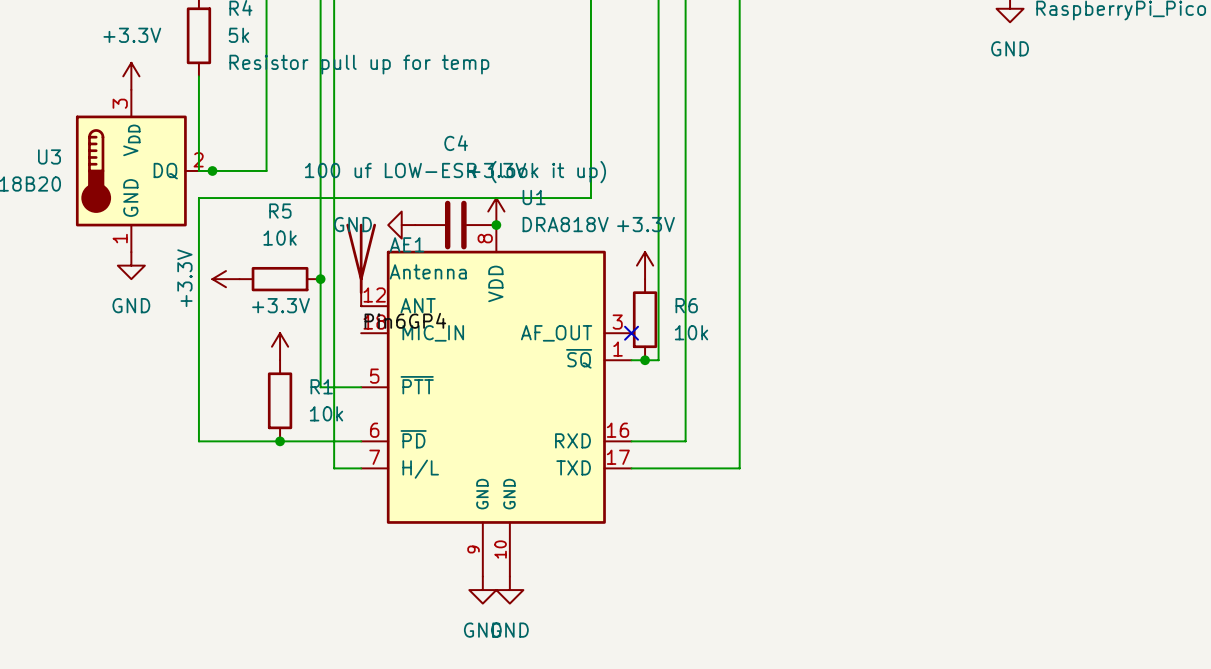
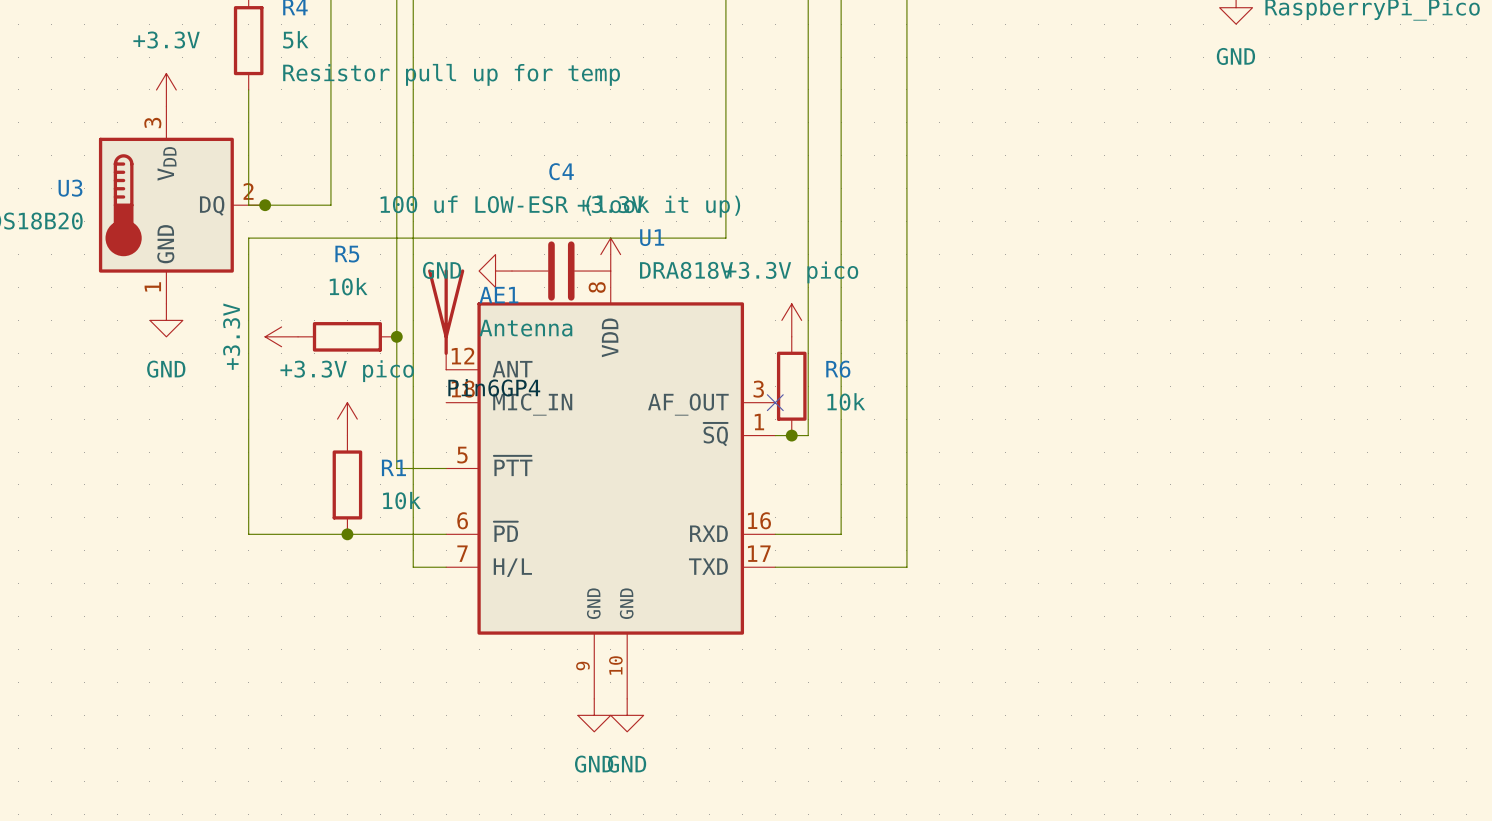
junction: (496, 225) -> none
power symbol: +3.3V (645, 265) -> +3.3V pico (791, 320)
power symbol: +3.3V (280, 346) -> +3.3V pico (347, 419)

